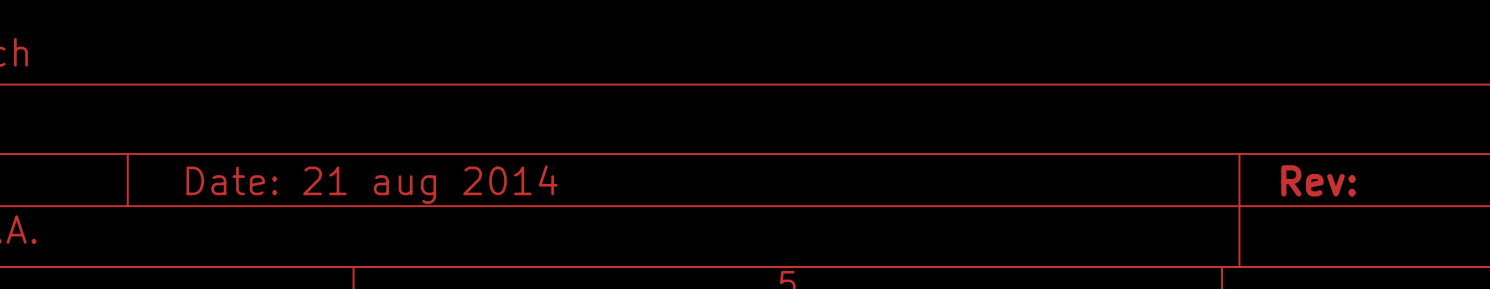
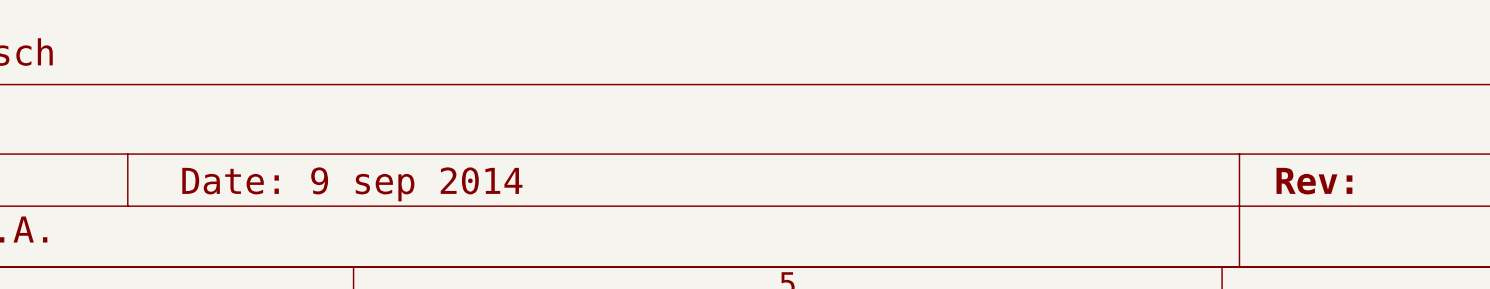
title block: Date: 21 aug 2014 (372, 184) -> Date: 9 sep 2014 (352, 184)

